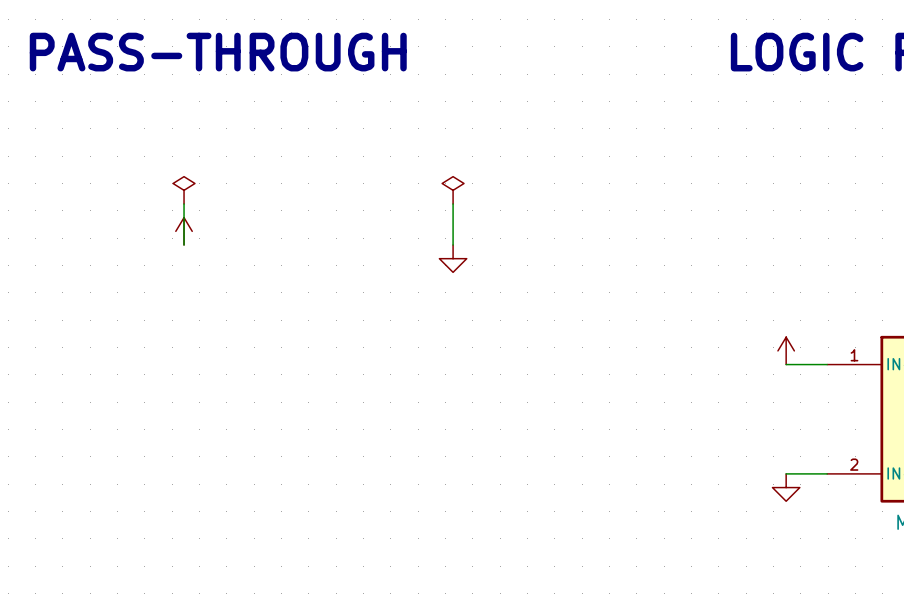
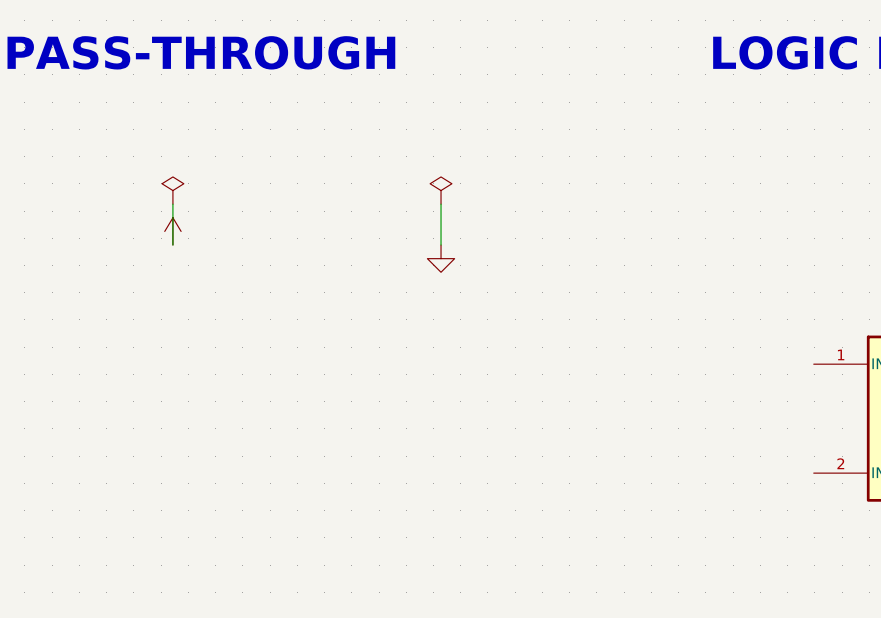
power symbol: (786, 350) -> none
wire: (786, 364) (827, 364) -> none
wire: (786, 473) (827, 473) -> none
power symbol: (786, 487) -> none

